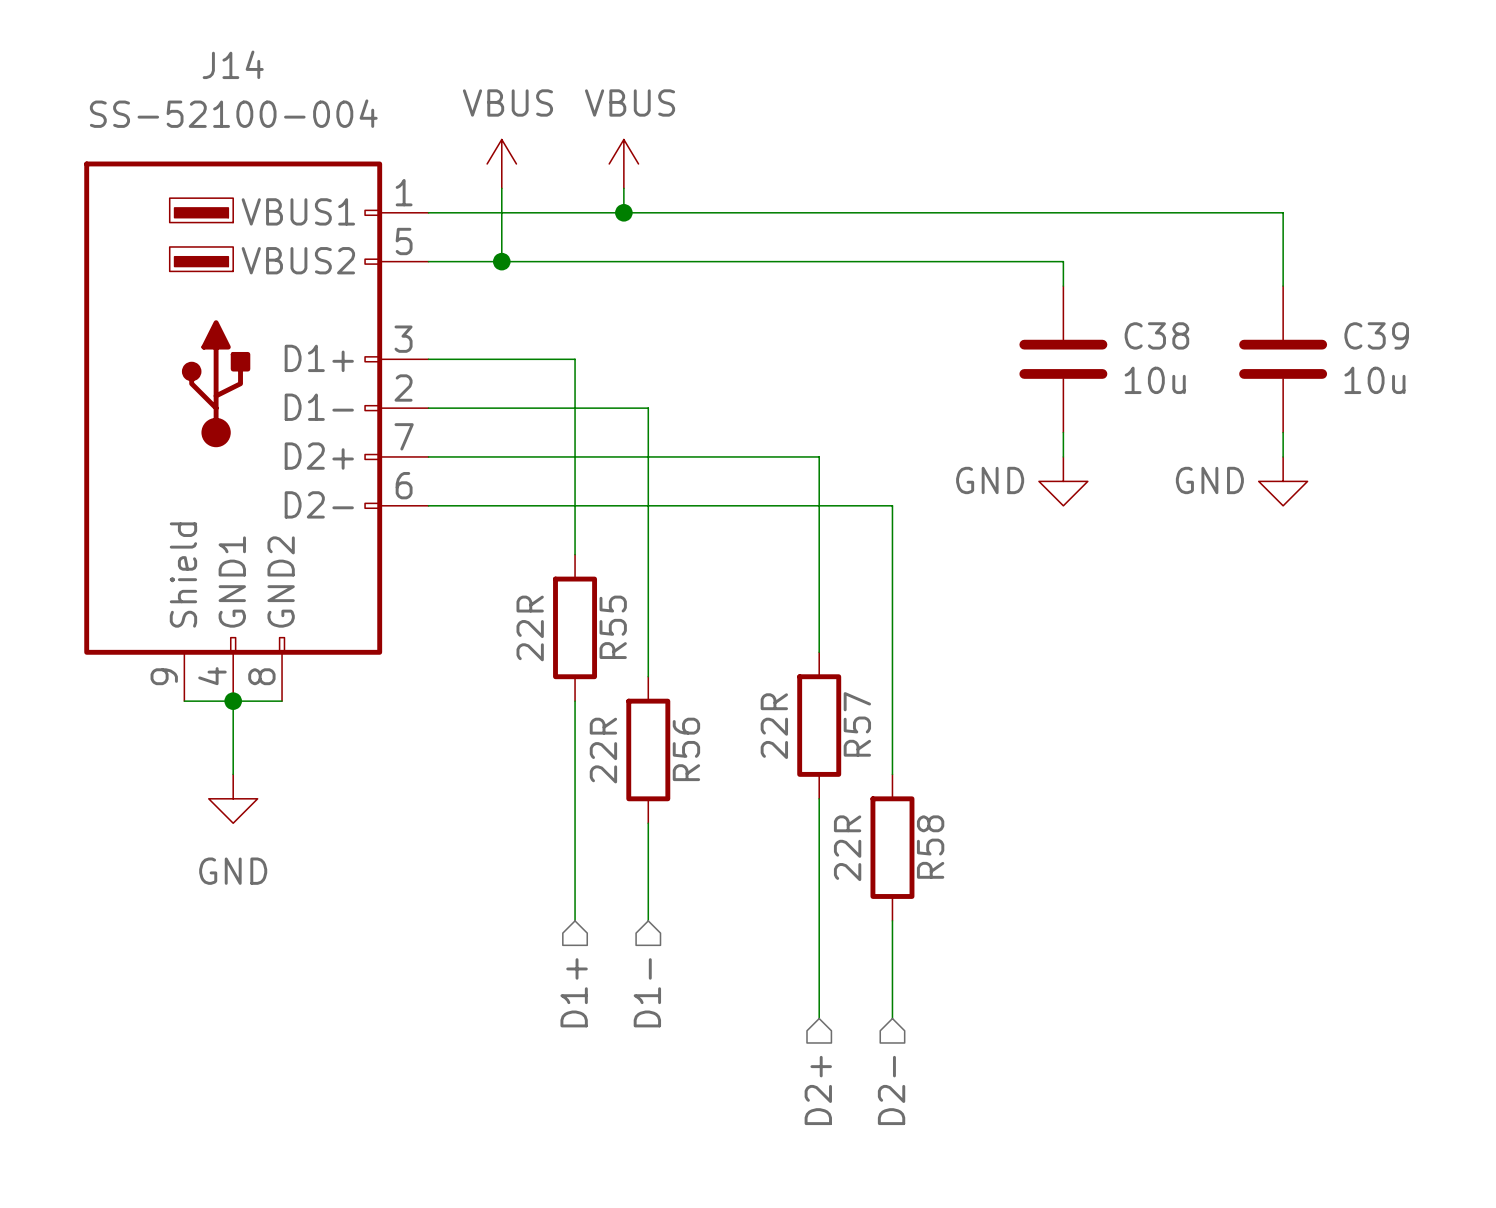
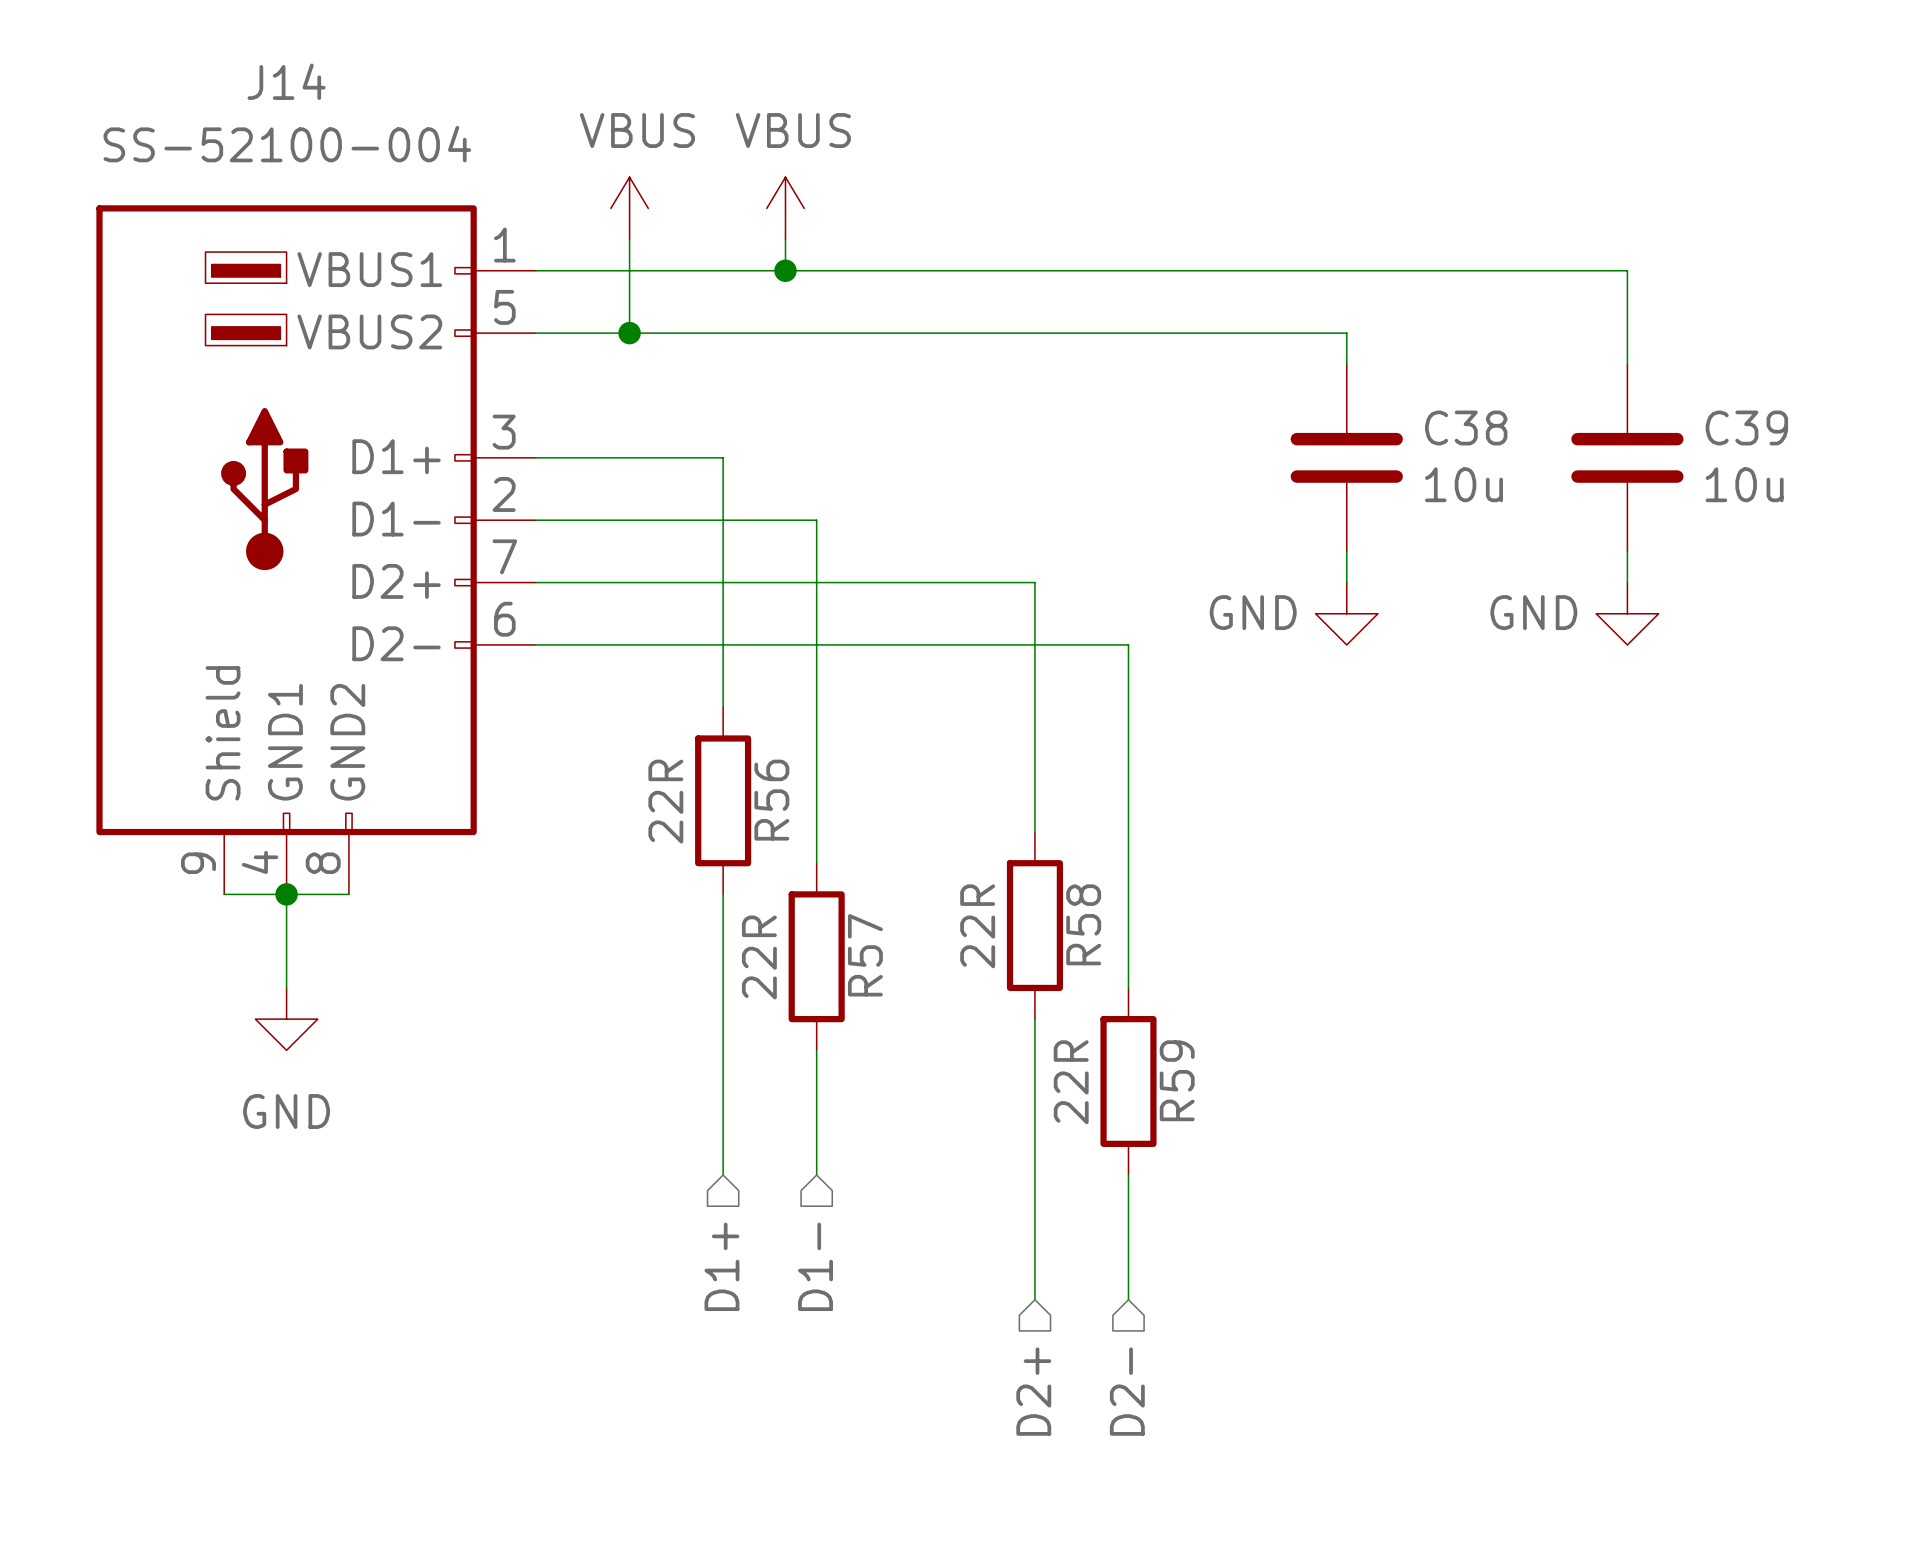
R55 name: R55 (613, 627) -> R56 (771, 800)
R57 name: R57 (857, 724) -> R58 (1083, 924)
R56 name: R56 (686, 749) -> R57 (865, 955)
R58 name: R58 (930, 847) -> R59 (1177, 1080)

